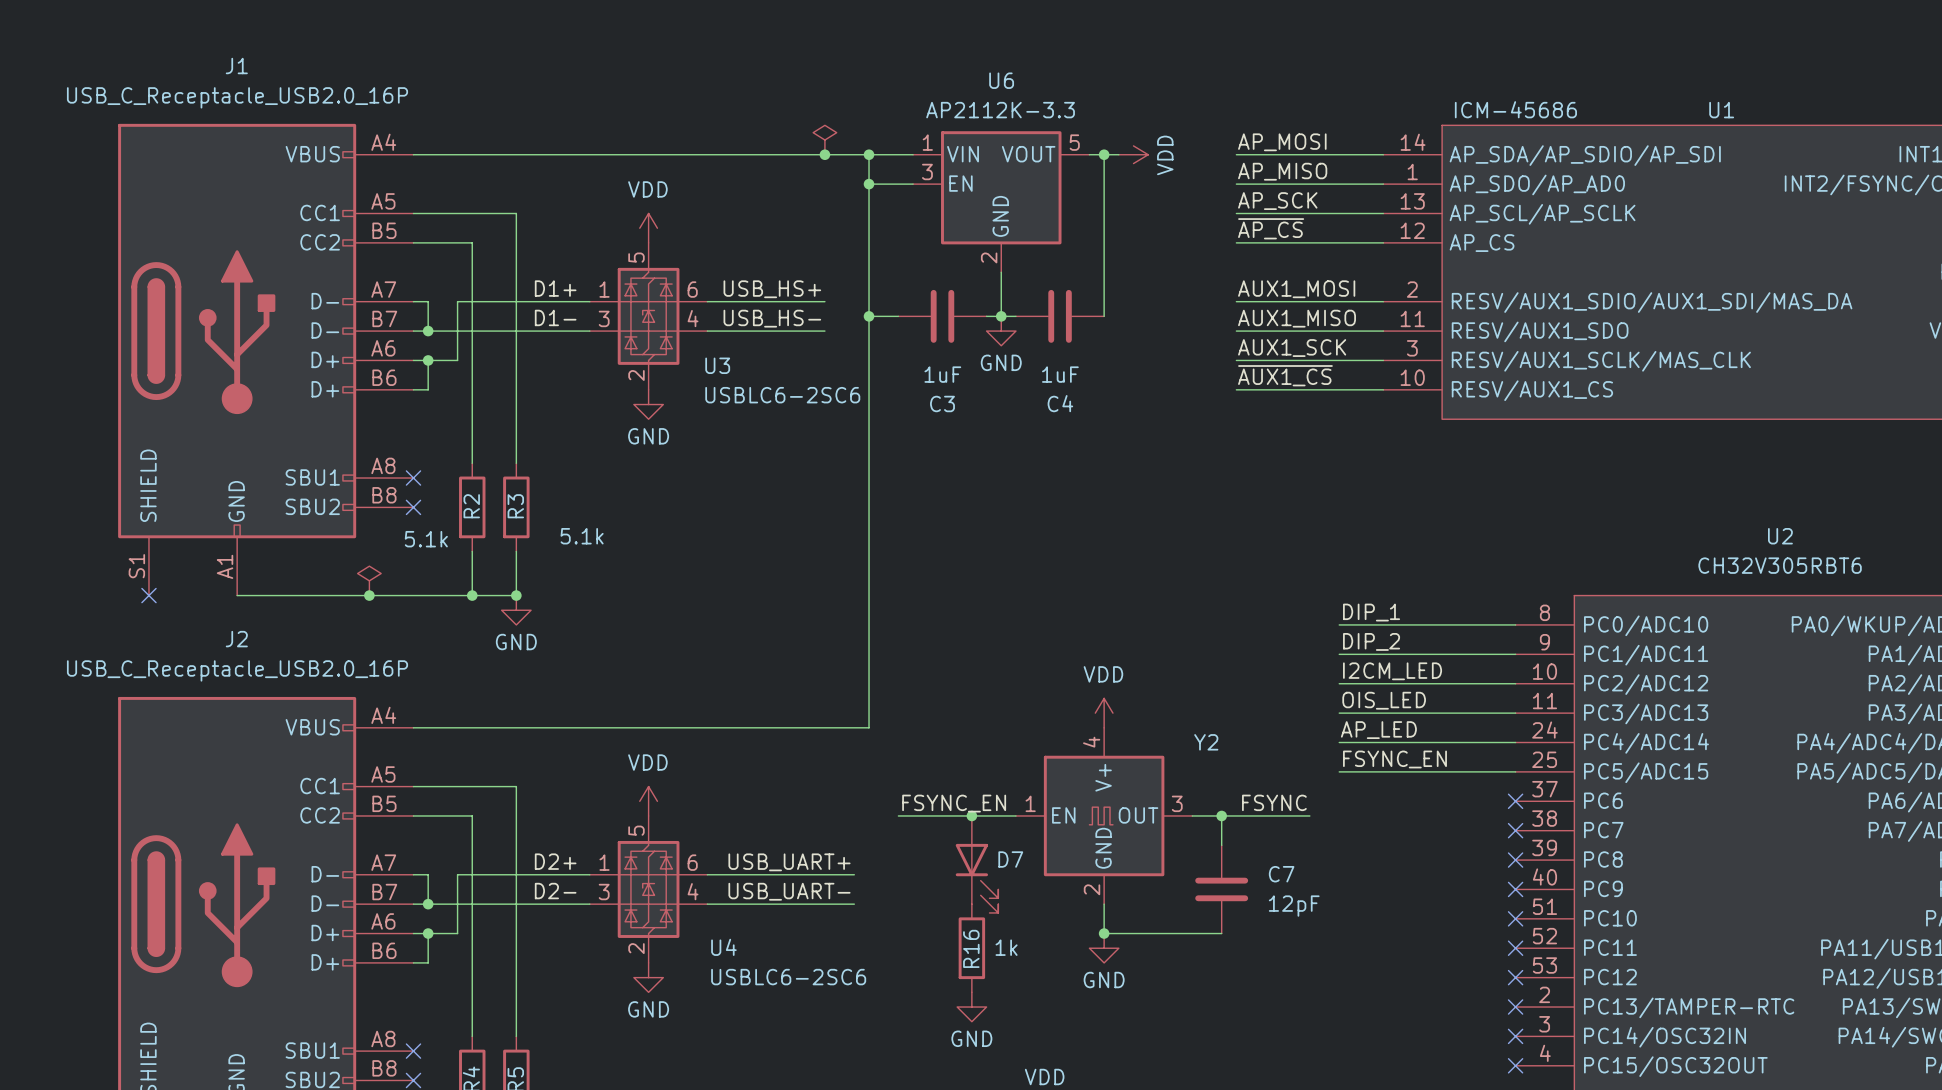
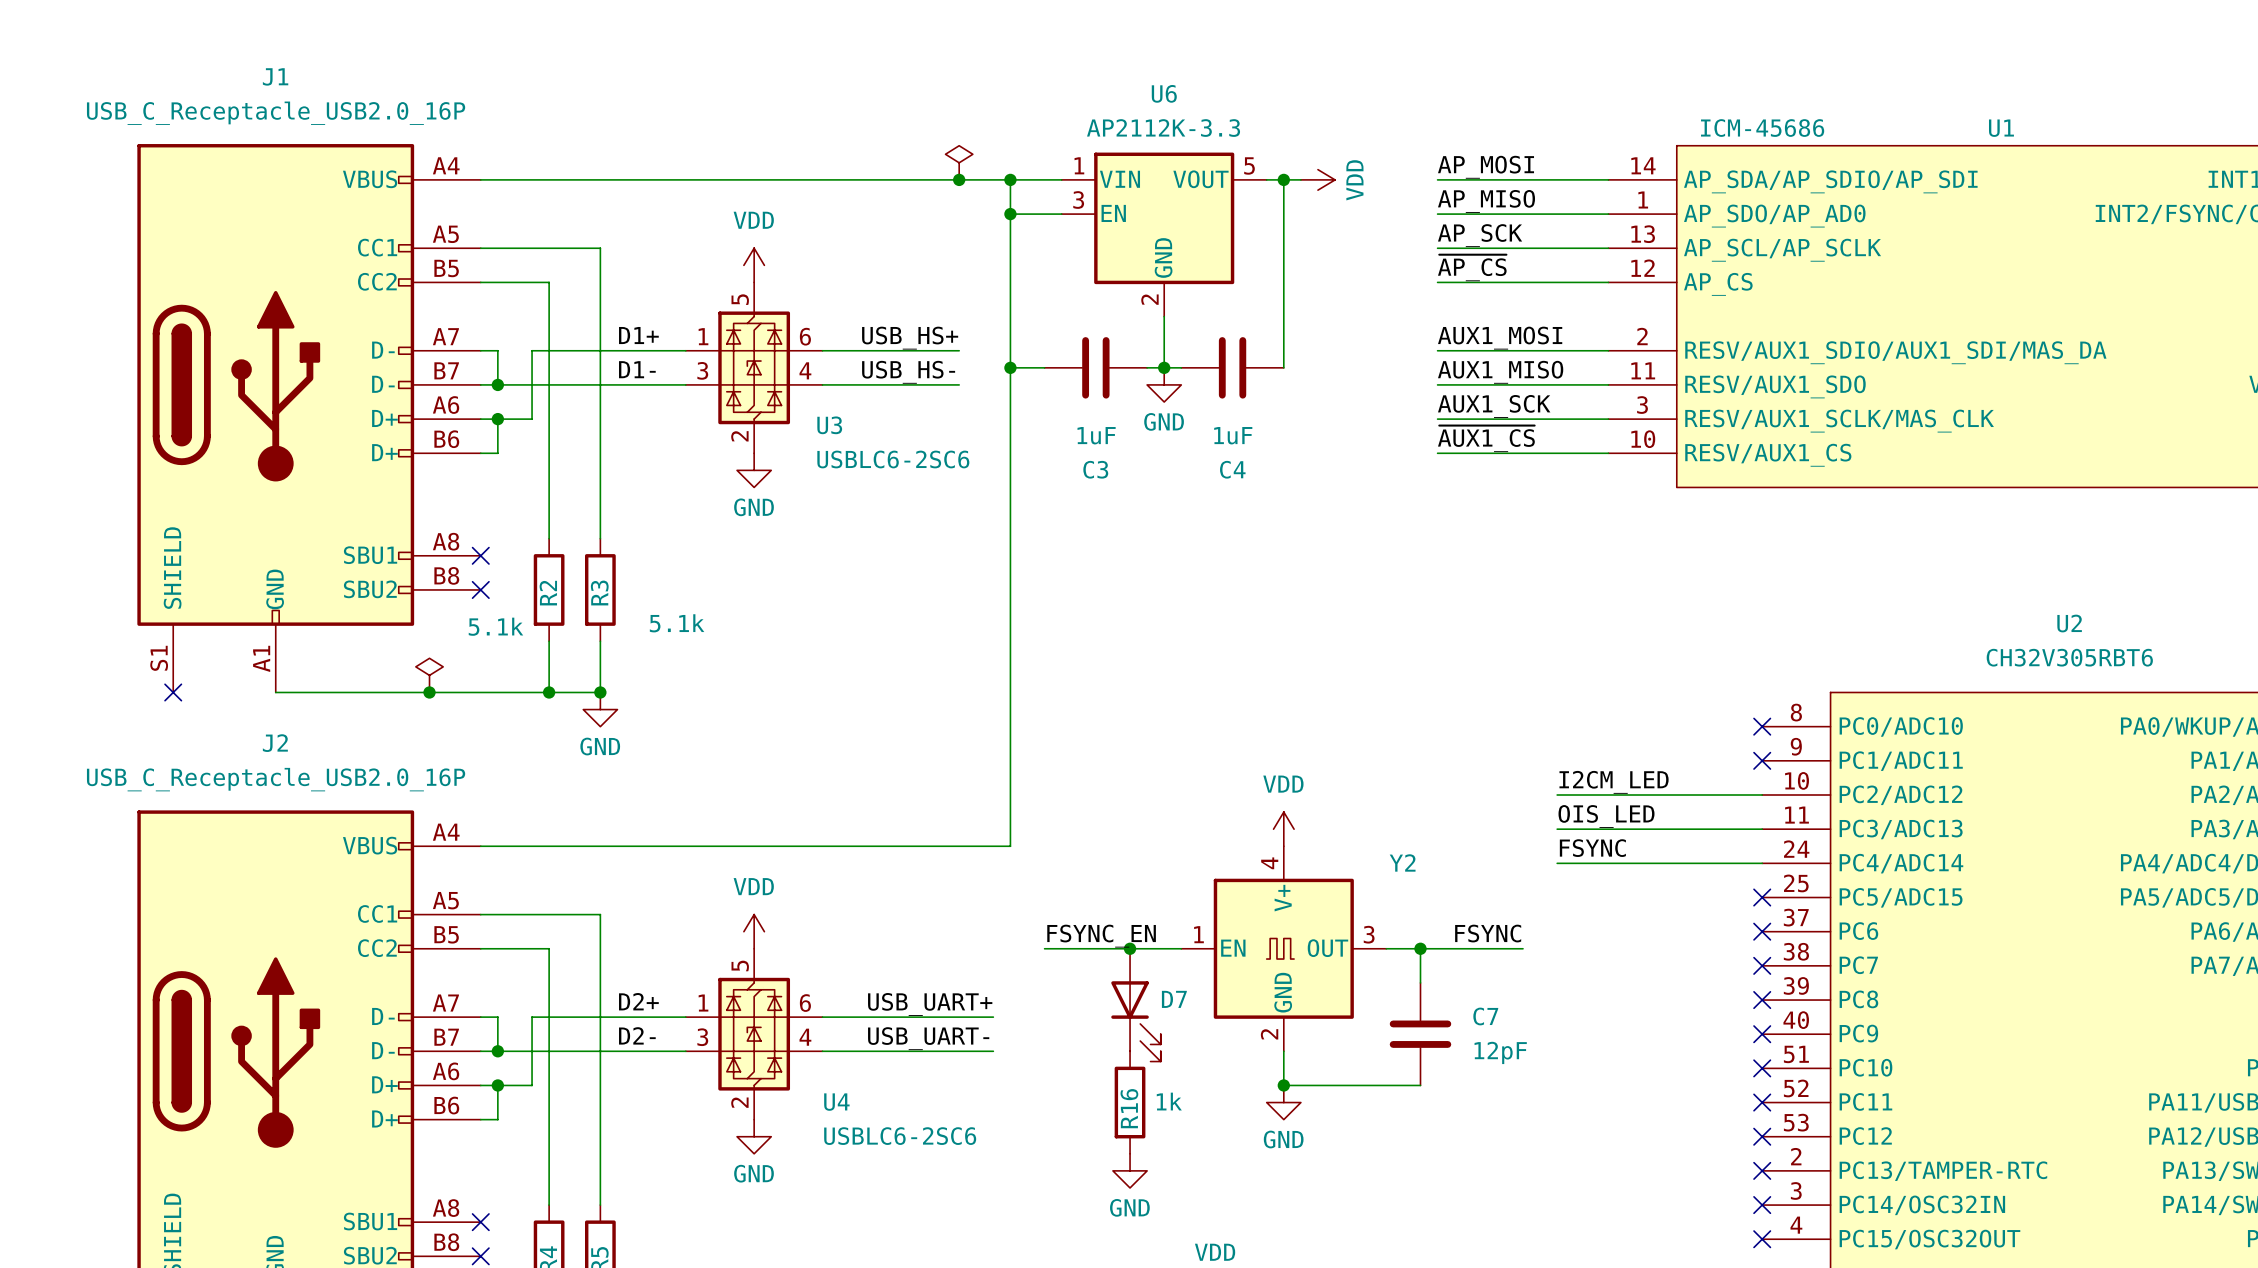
label: DIP_1 (1371, 612) -> none
wire: (1339, 624) (1515, 624) -> none
no-connect mark: none -> (1762, 726)
label: DIP_2 (1371, 641) -> none
wire: (1339, 654) (1515, 654) -> none
no-connect mark: none -> (1762, 760)
label: AP_LED (1378, 730) -> FSYNC (1592, 848)
label: FSYNC_EN (1394, 759) -> none
wire: (1339, 771) (1515, 771) -> none
no-connect mark: none -> (1762, 897)

